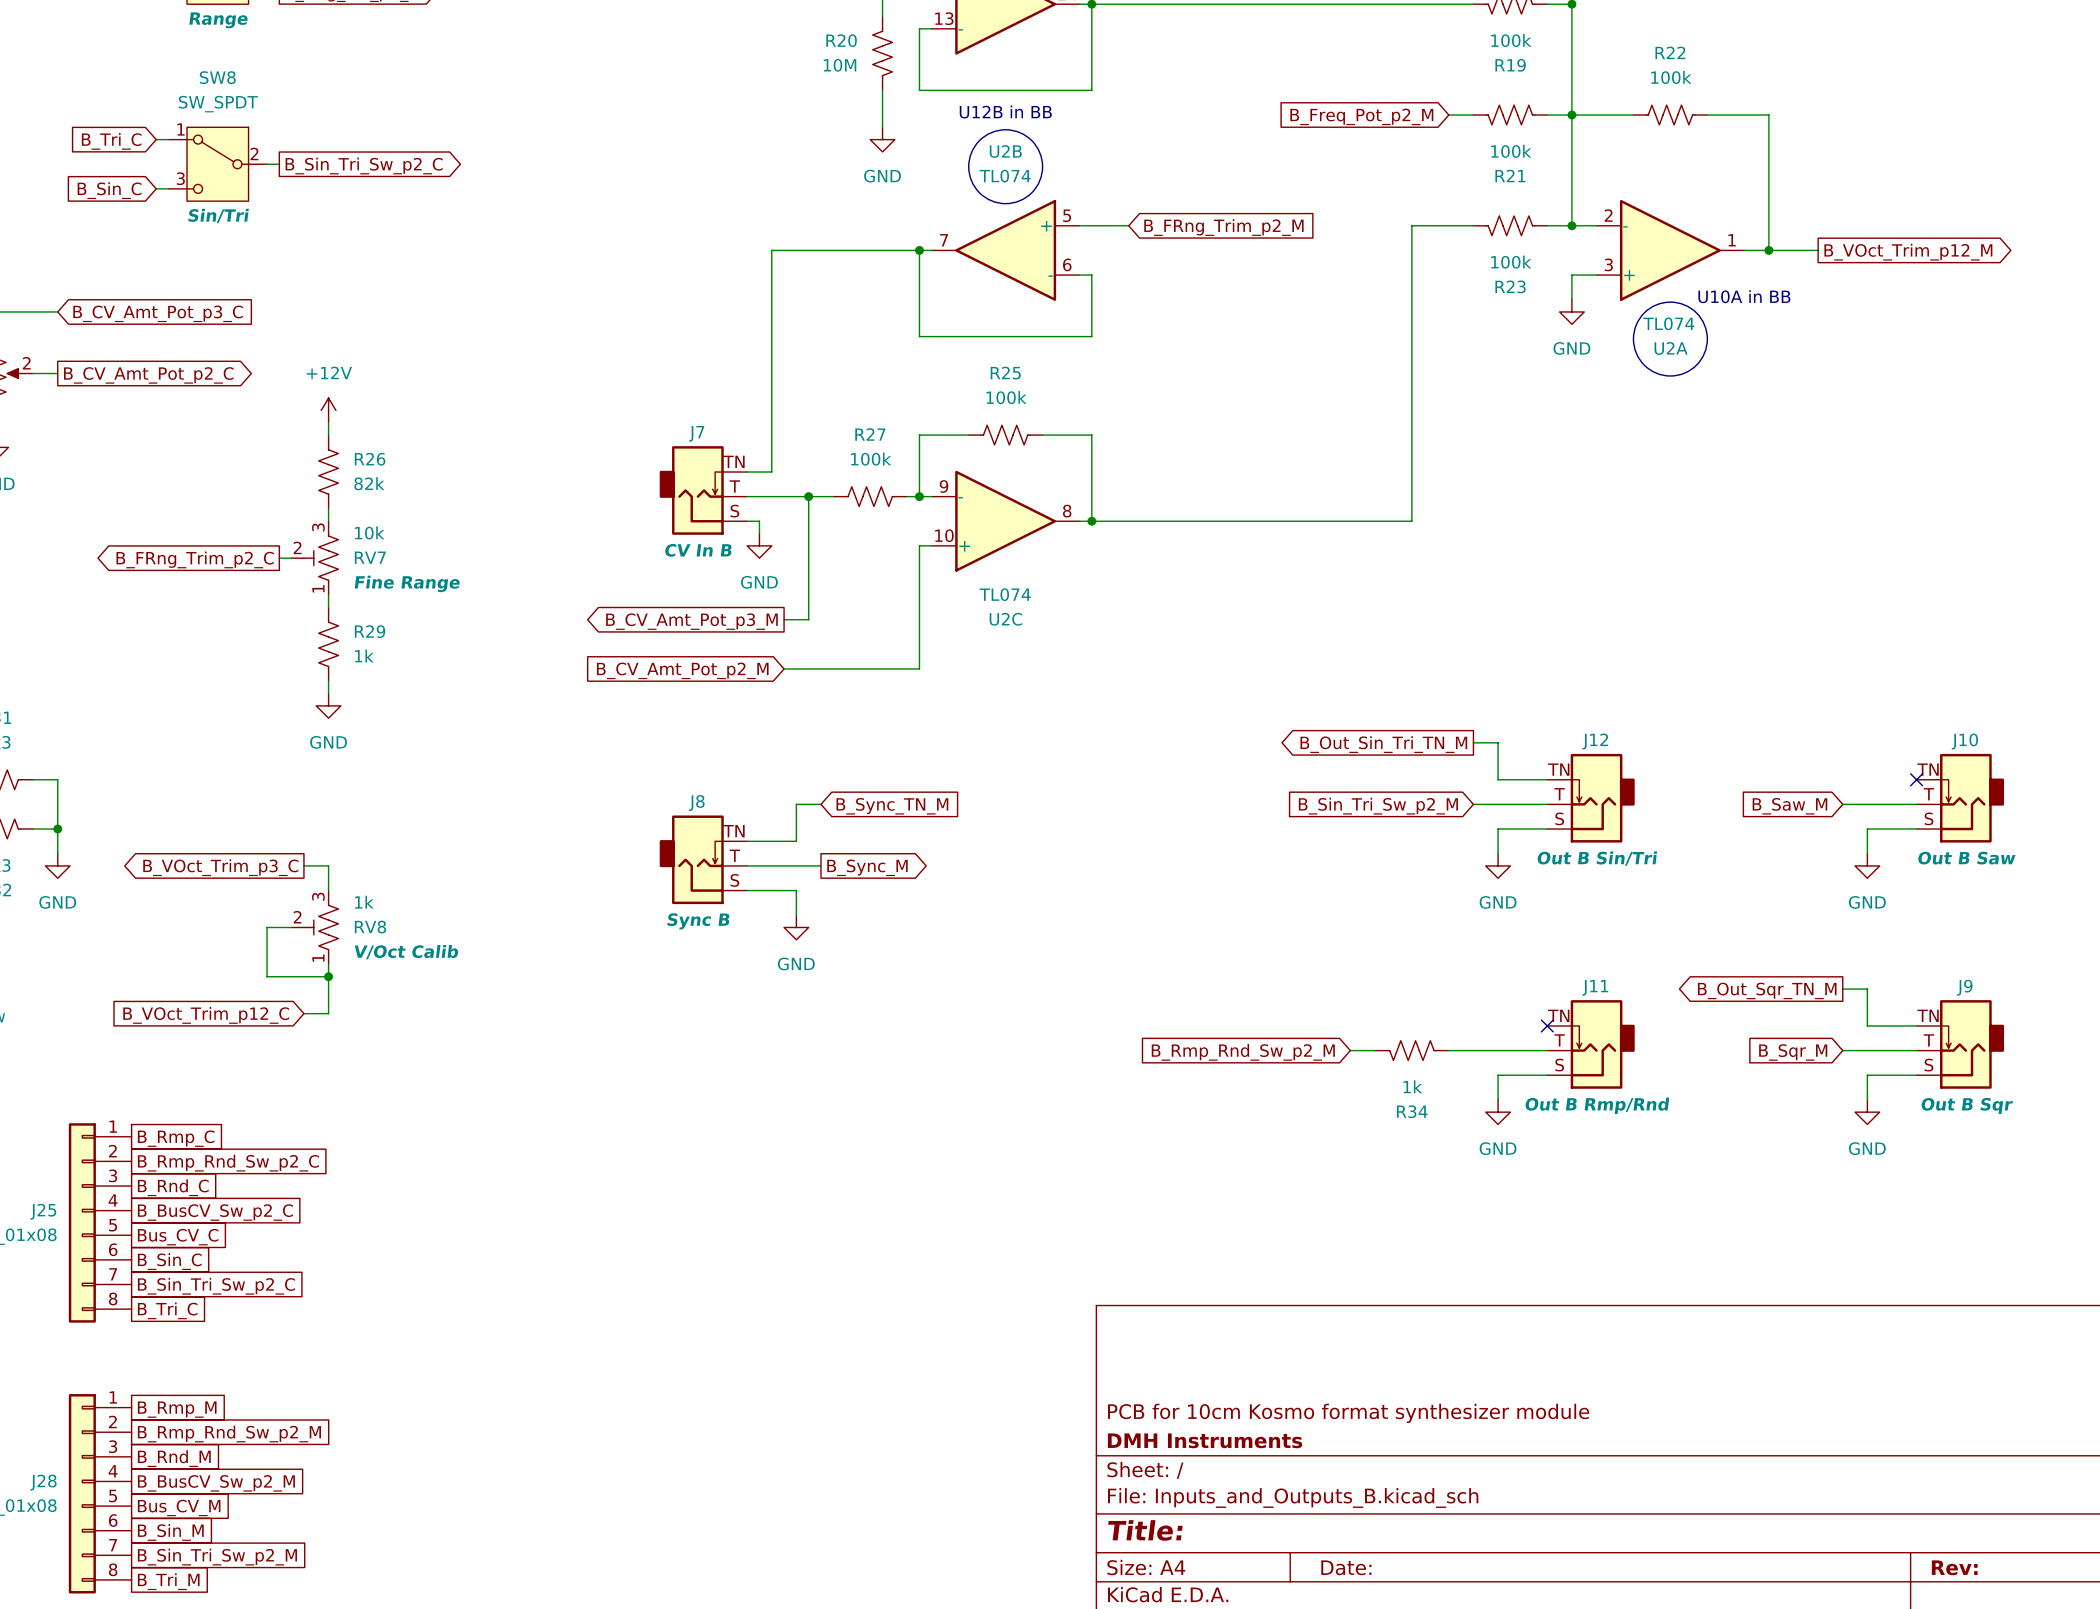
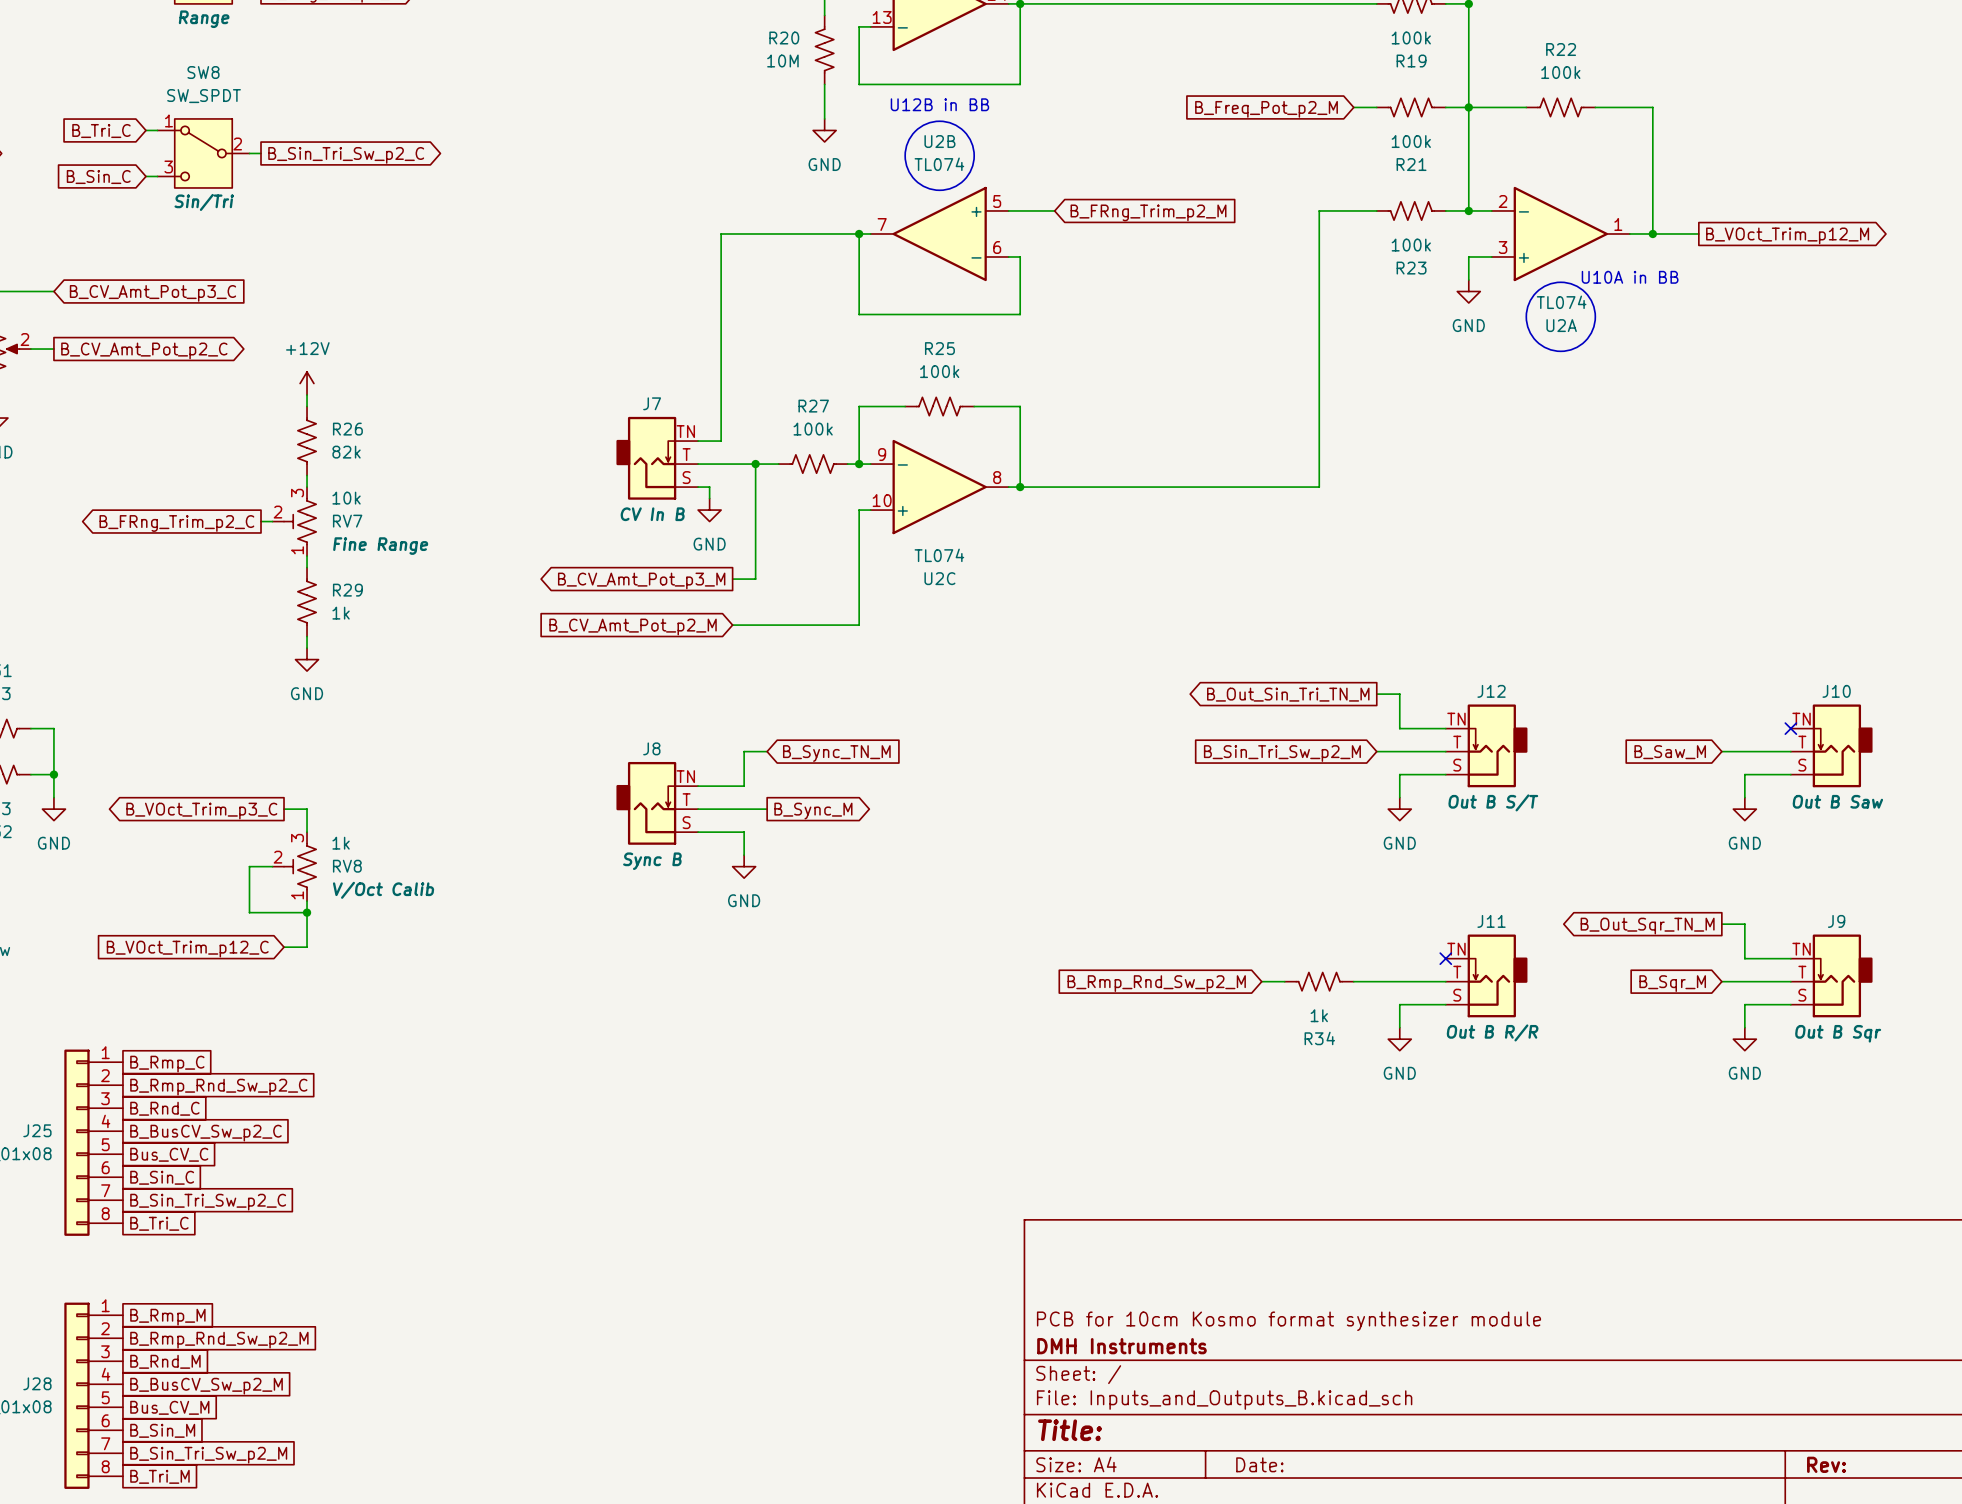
J12 text: Out B Sin/Tri (1597, 858) -> Out B S/T (1493, 802)
J11 text: Out B Rmp/Rnd (1597, 1105) -> Out B R/R (1492, 1032)

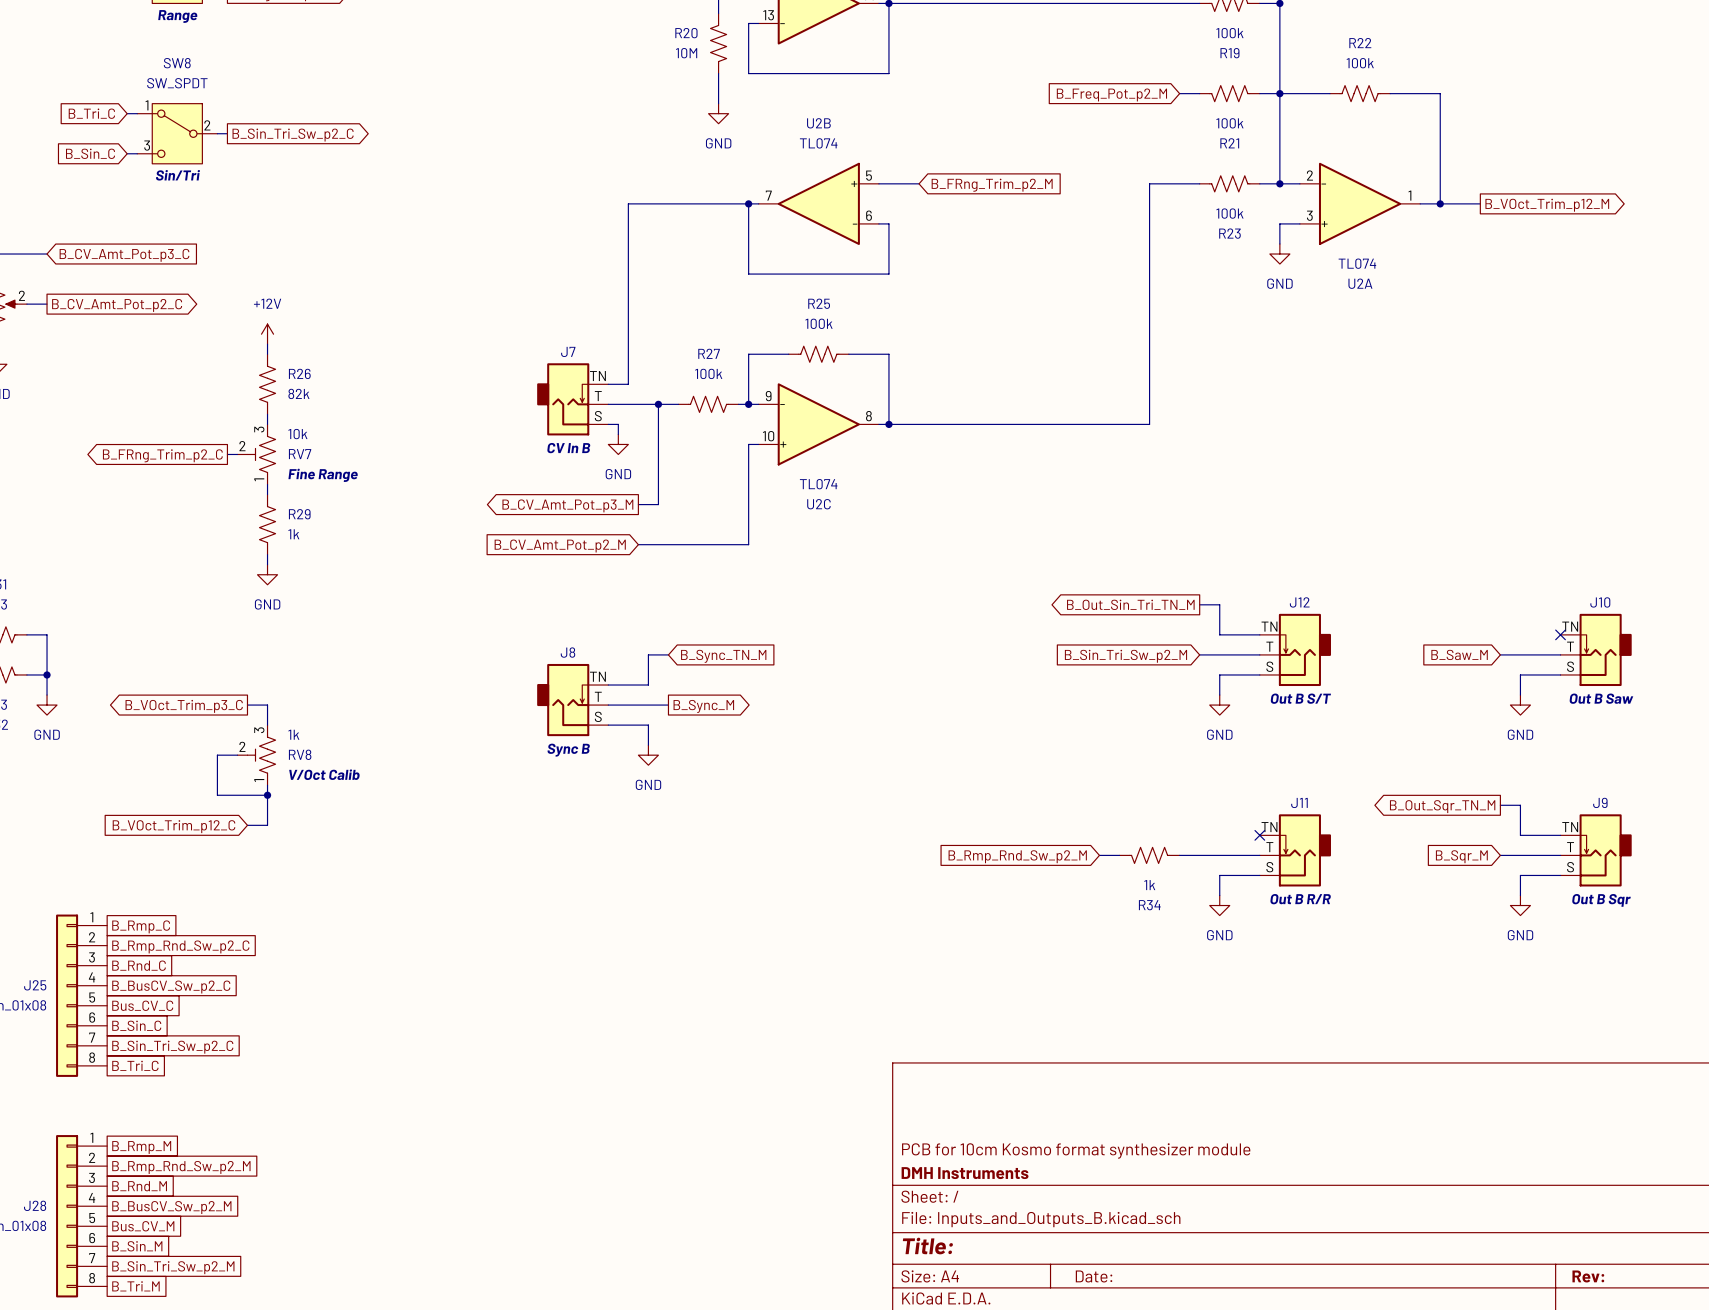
text: U12B in BB (939, 104) -> none
drawing: [905, 121, 975, 191] -> none
text: U10A in BB (1630, 277) -> none
drawing: [1526, 282, 1596, 352] -> none

